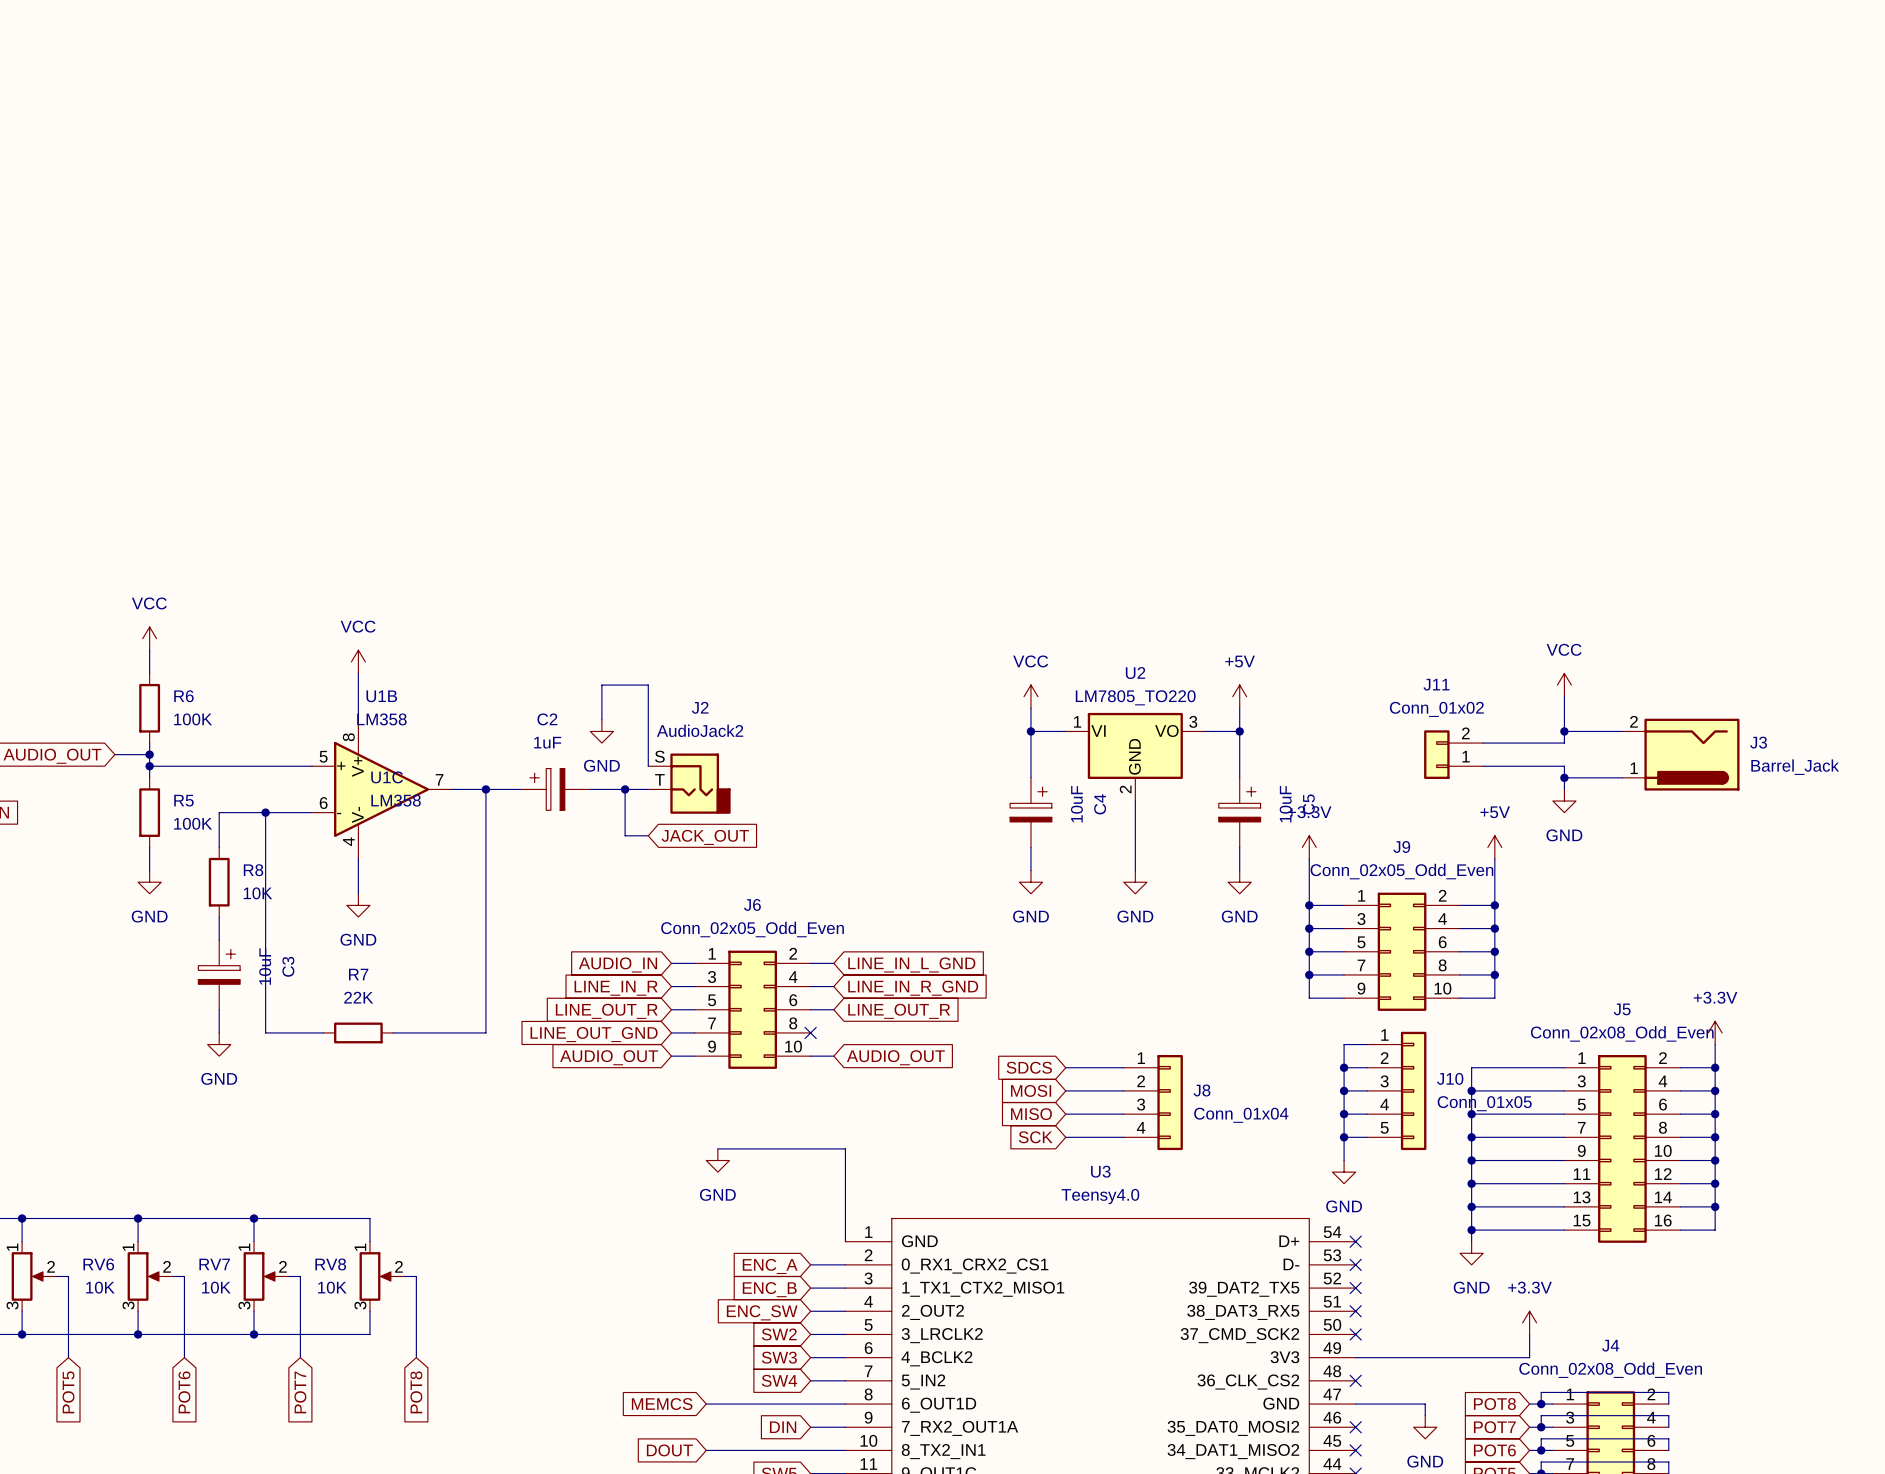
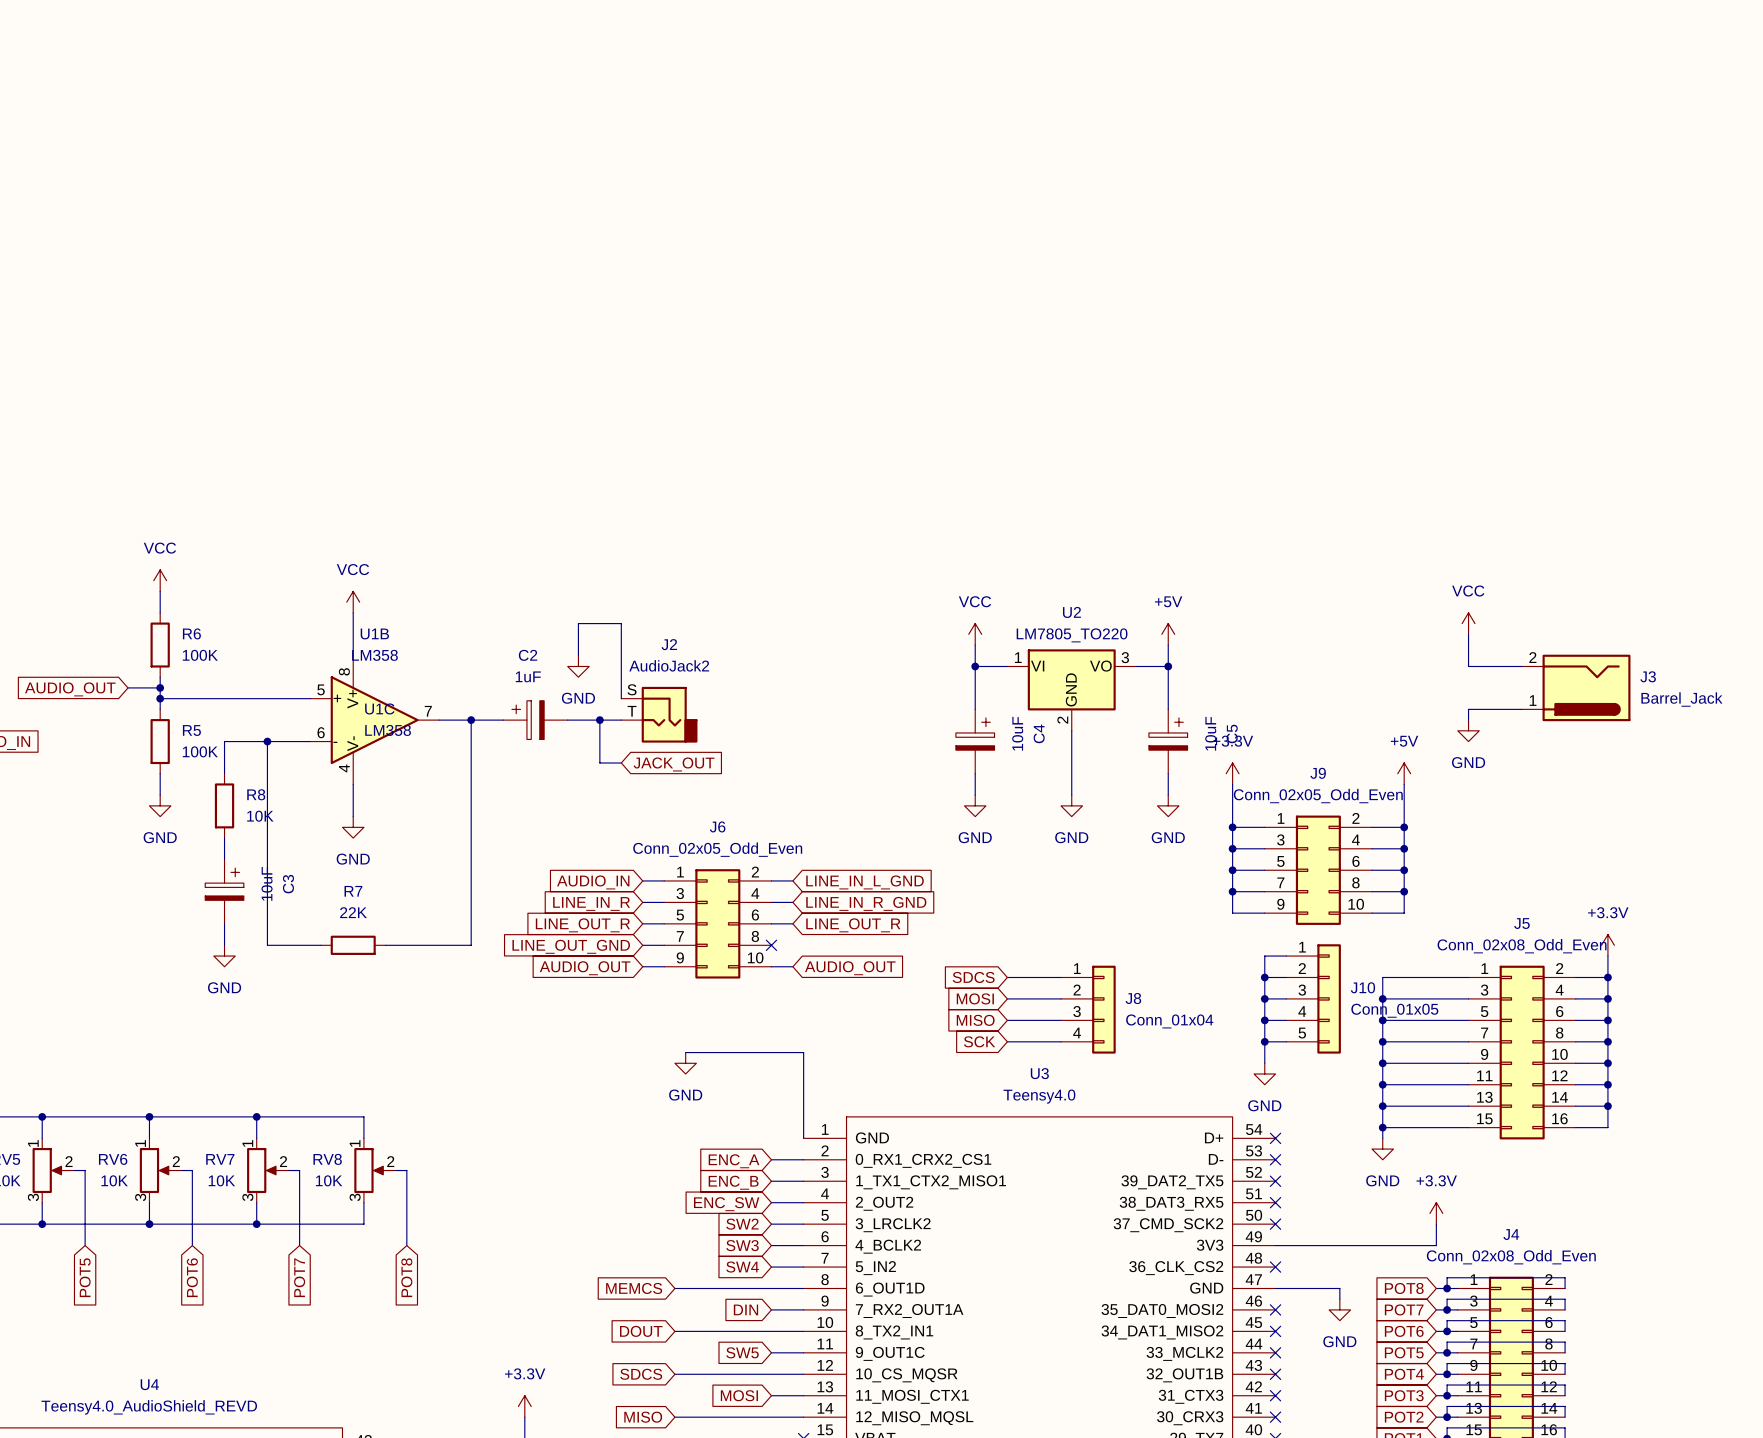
wire: (1564, 731) (1564, 743) (1483, 743) -> none
junction: (1564, 731) -> none
J11: Conn_01x02 (1453, 754) -> none
wire: (1483, 766) (1564, 766) (1564, 777) -> none
junction: (1564, 777) -> none

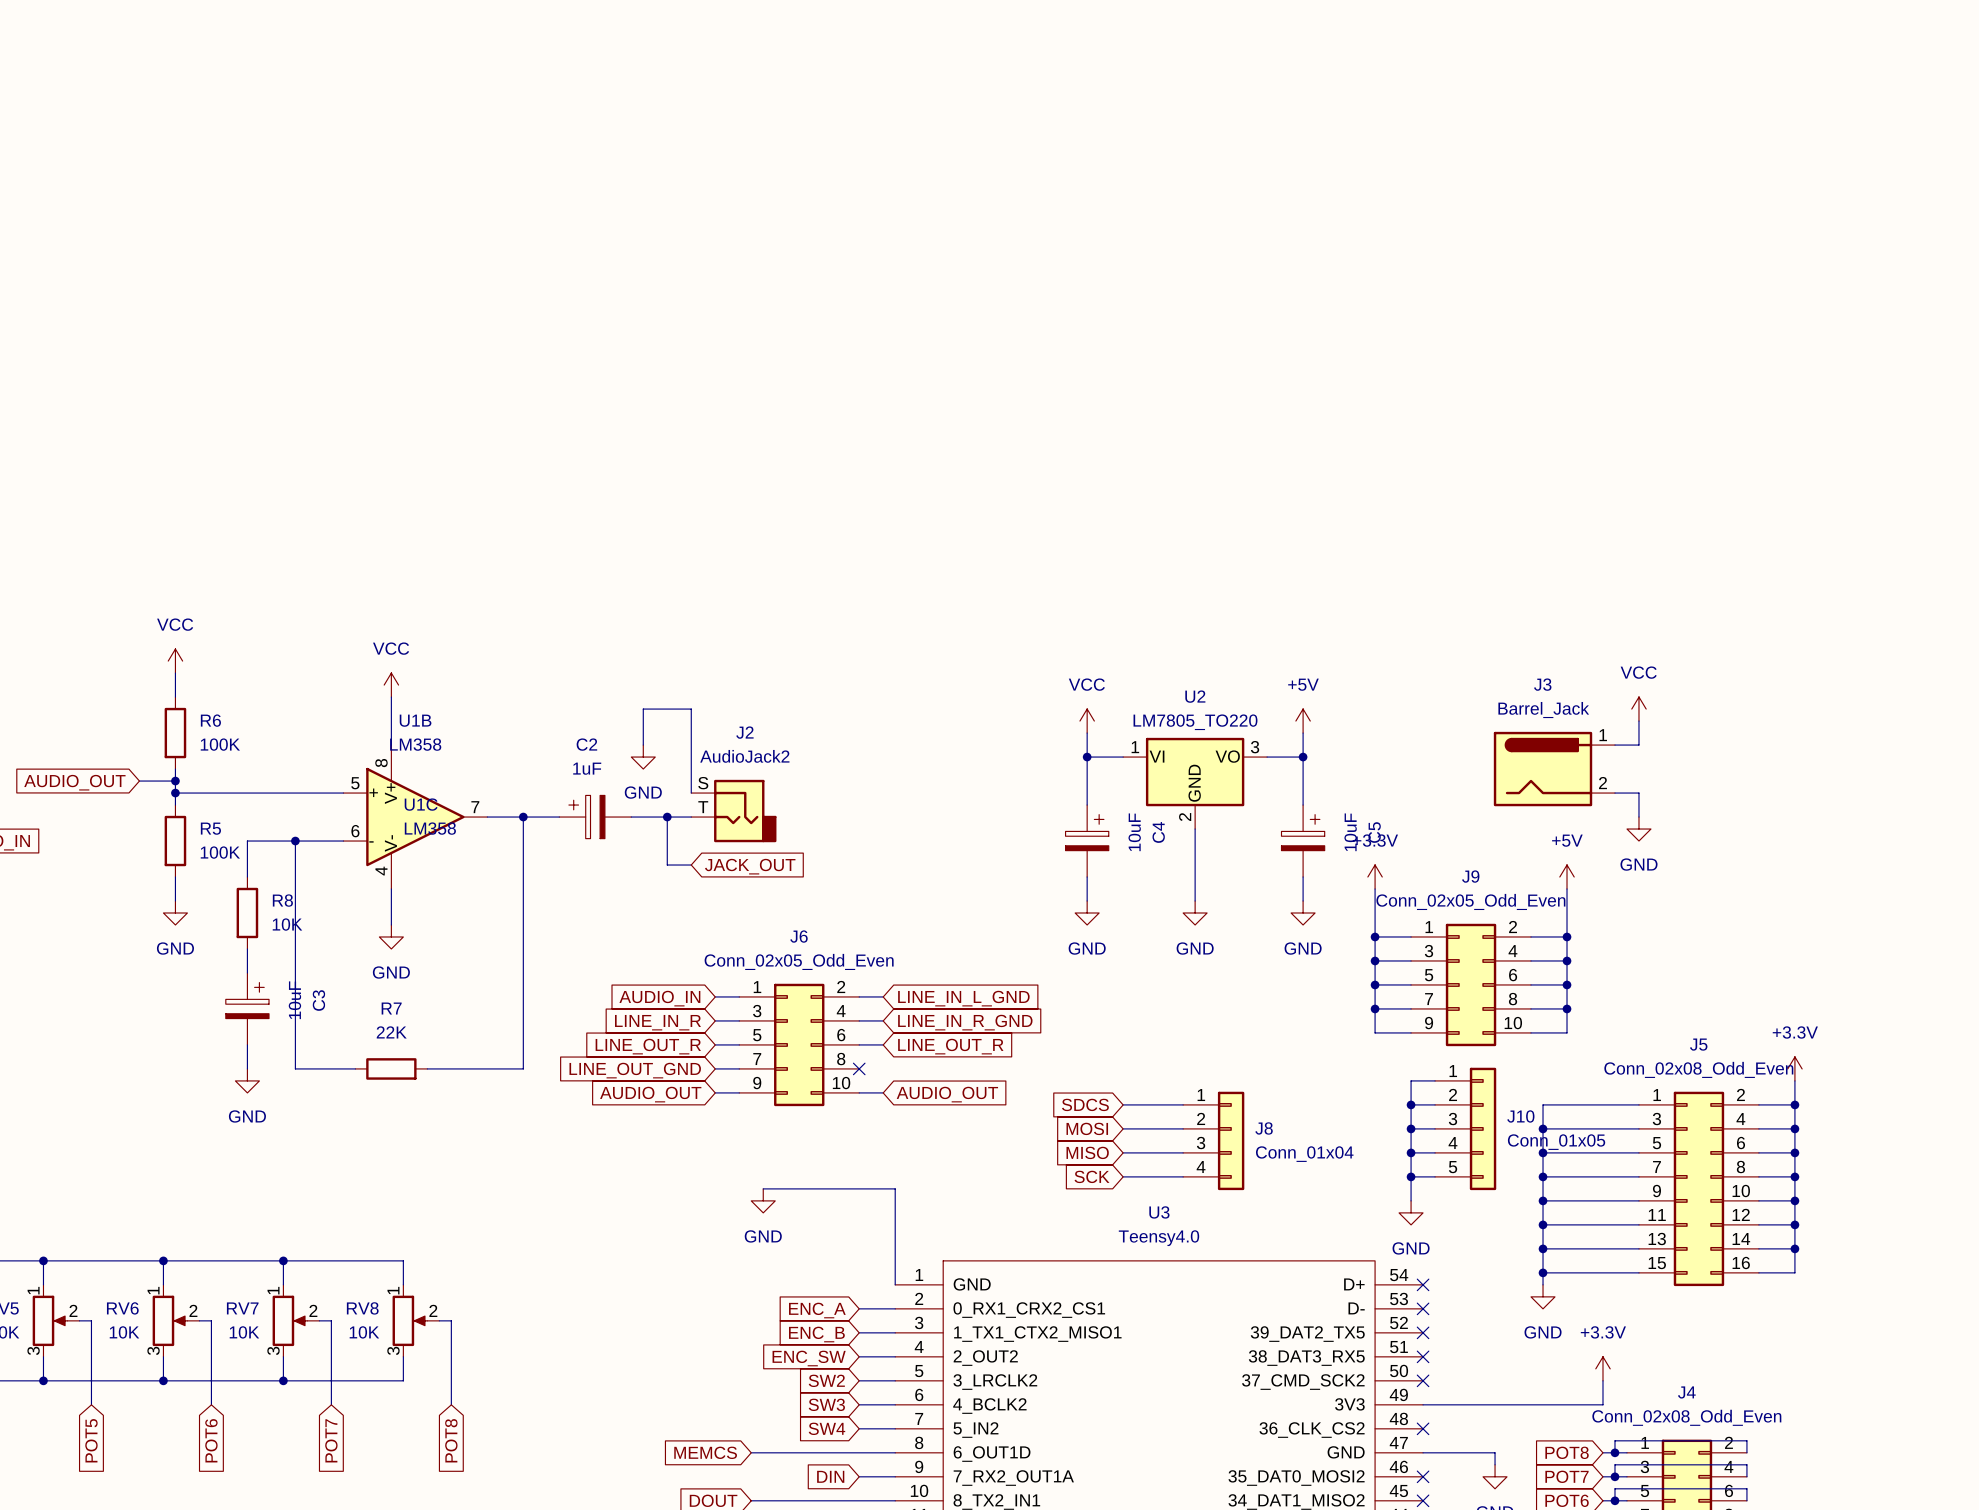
wire: (1468, 655) (1468, 666) (1522, 666) -> (1638, 745) (1614, 745)
J3 name position: J3 (1648, 676) -> J3 (1542, 684)
J3 position: (1576, 687) -> (1554, 769)
J3 rotation: 0° (1586, 687) -> 180° (1543, 769)
J3 value position: Barrel_Jack (1681, 699) -> Barrel_Jack (1543, 710)
wire: (1468, 709) (1522, 709) -> (1638, 805) (1638, 793) (1614, 793)

